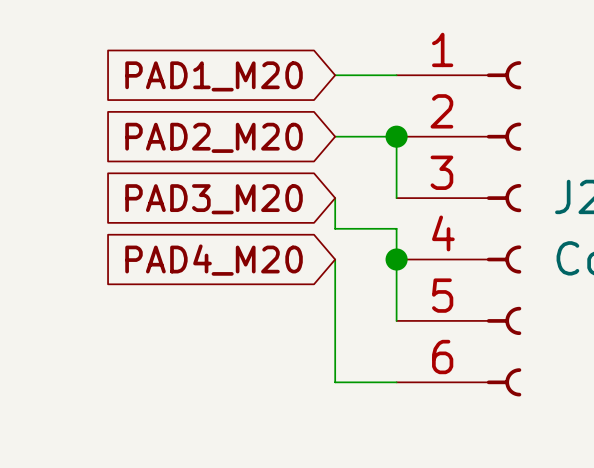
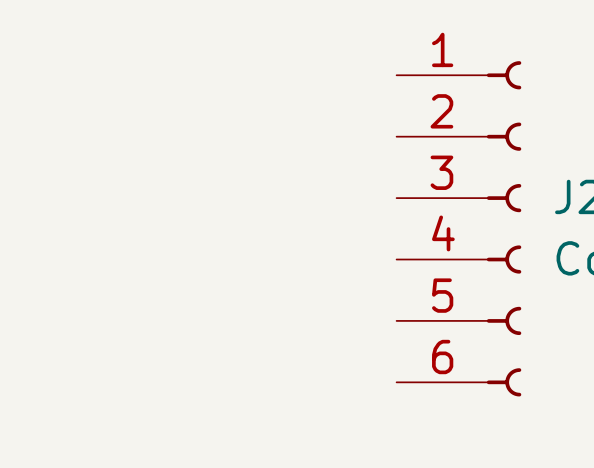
wire: (335, 75) (396, 75) -> none
global label: PAD1_M20 (214, 76) -> none
wire: (335, 136) (396, 136) (396, 198) -> none
junction: (396, 136) -> none
global label: PAD2_M20 (214, 137) -> none
wire: (335, 198) (335, 228) (396, 228) (396, 320) -> none
global label: PAD3_M20 (214, 199) -> none
wire: (335, 259) (335, 382) (396, 382) -> none
junction: (396, 259) -> none
global label: PAD4_M20 (214, 260) -> none

